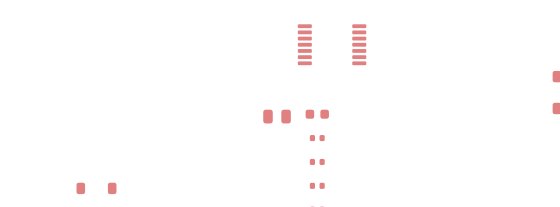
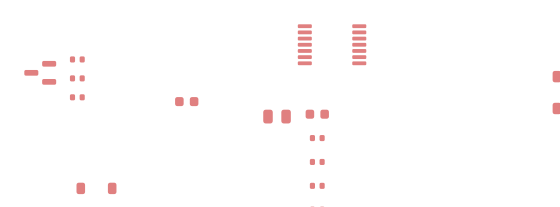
part: none -> (77, 59)
part: none -> (40, 72)
part: none -> (77, 78)
part: none -> (77, 97)
part: none -> (186, 101)

